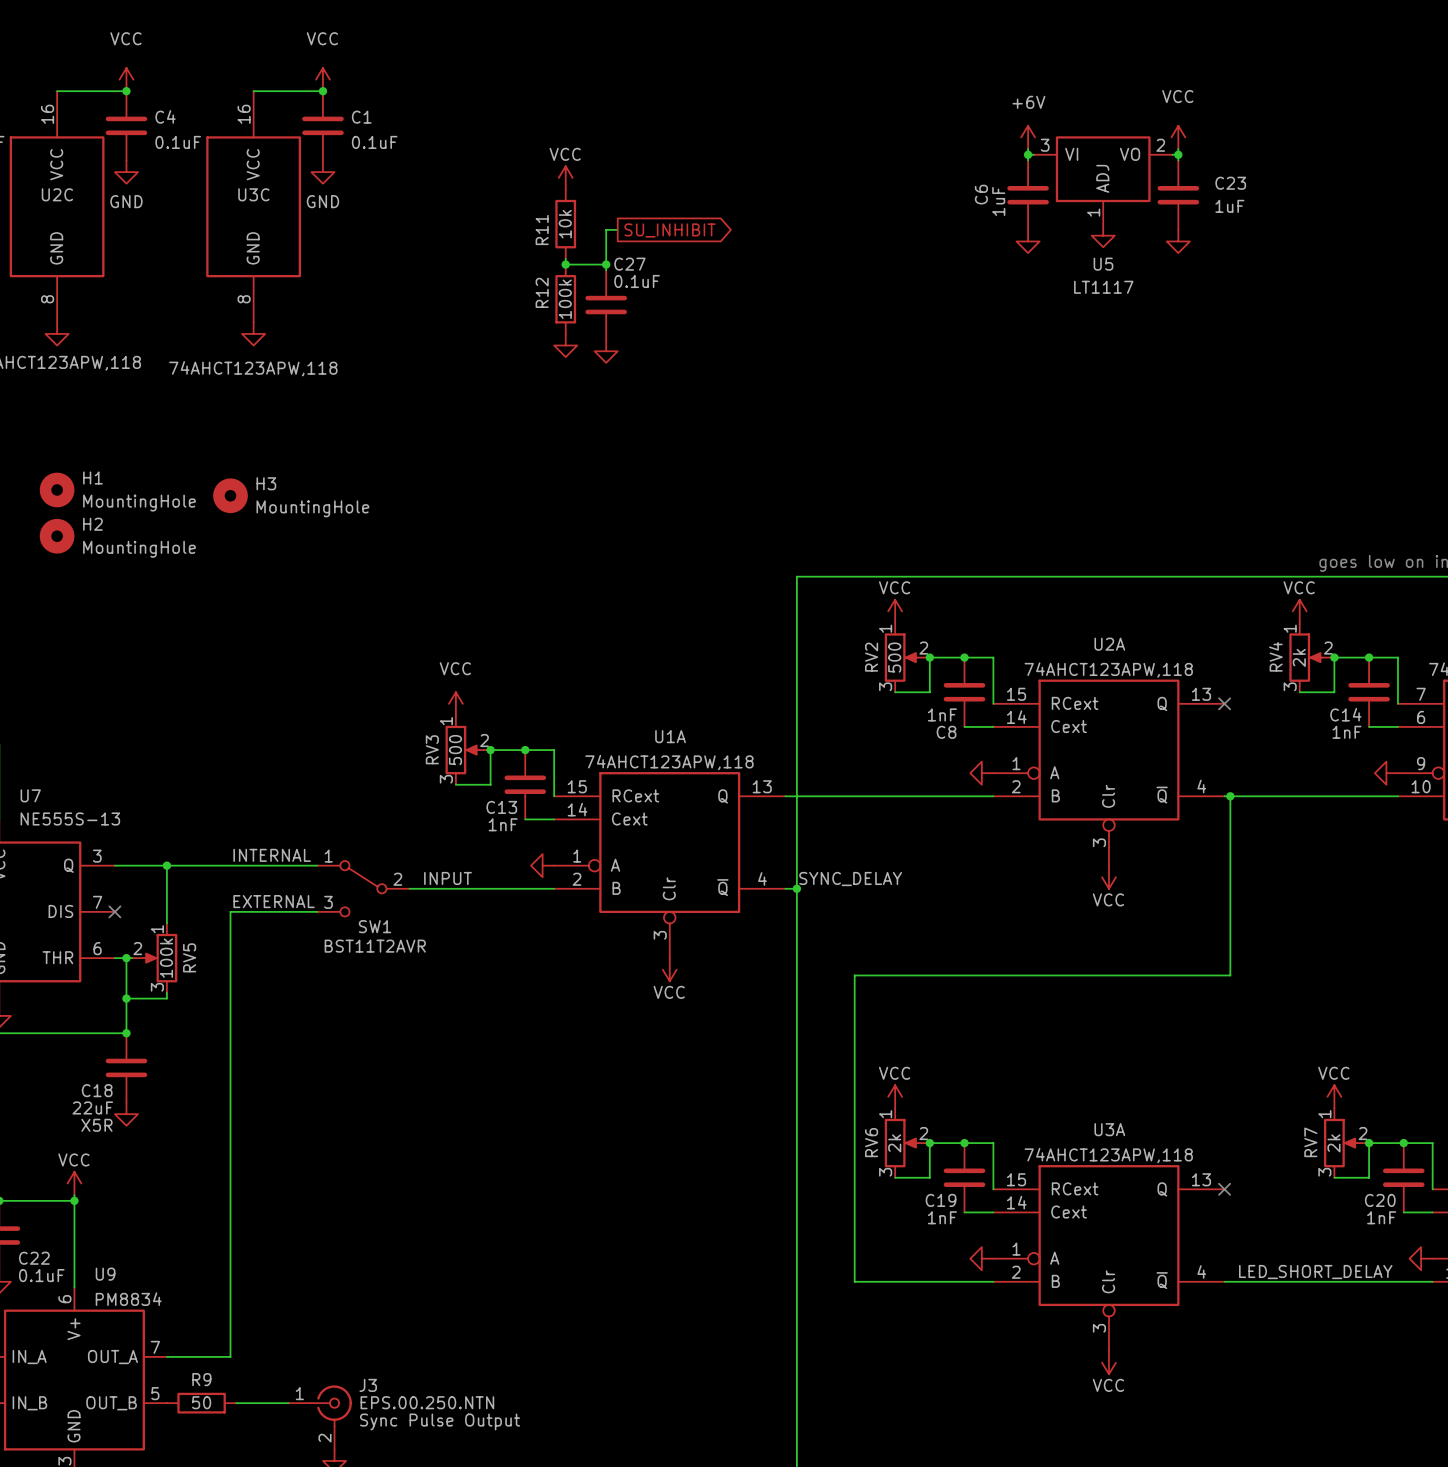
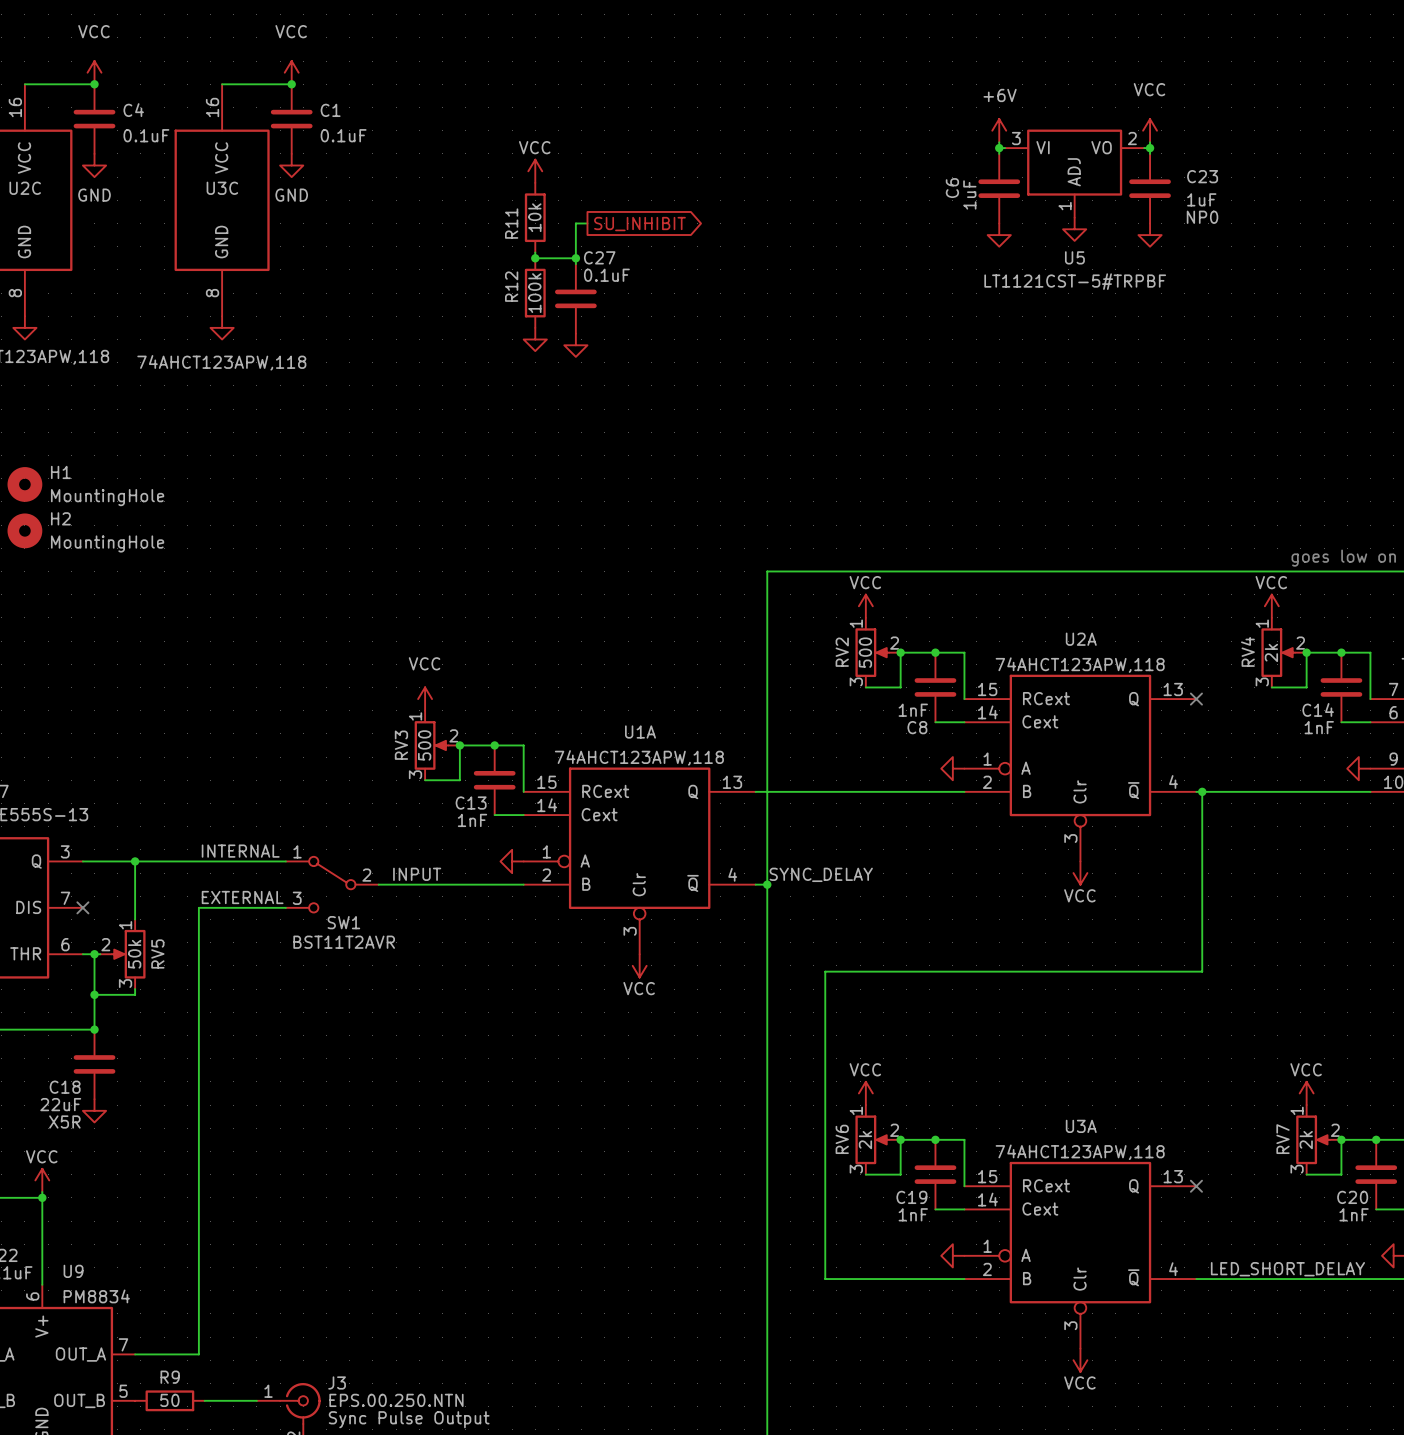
C23 text: none -> NP0 (1202, 217)
U5 value: LT1117 (1103, 287) -> LT1121CST-5#TRPBF (1075, 281)
H3: MountingHole (230, 495) -> none
RV5 value: 100k (166, 958) -> 50k (134, 954)

